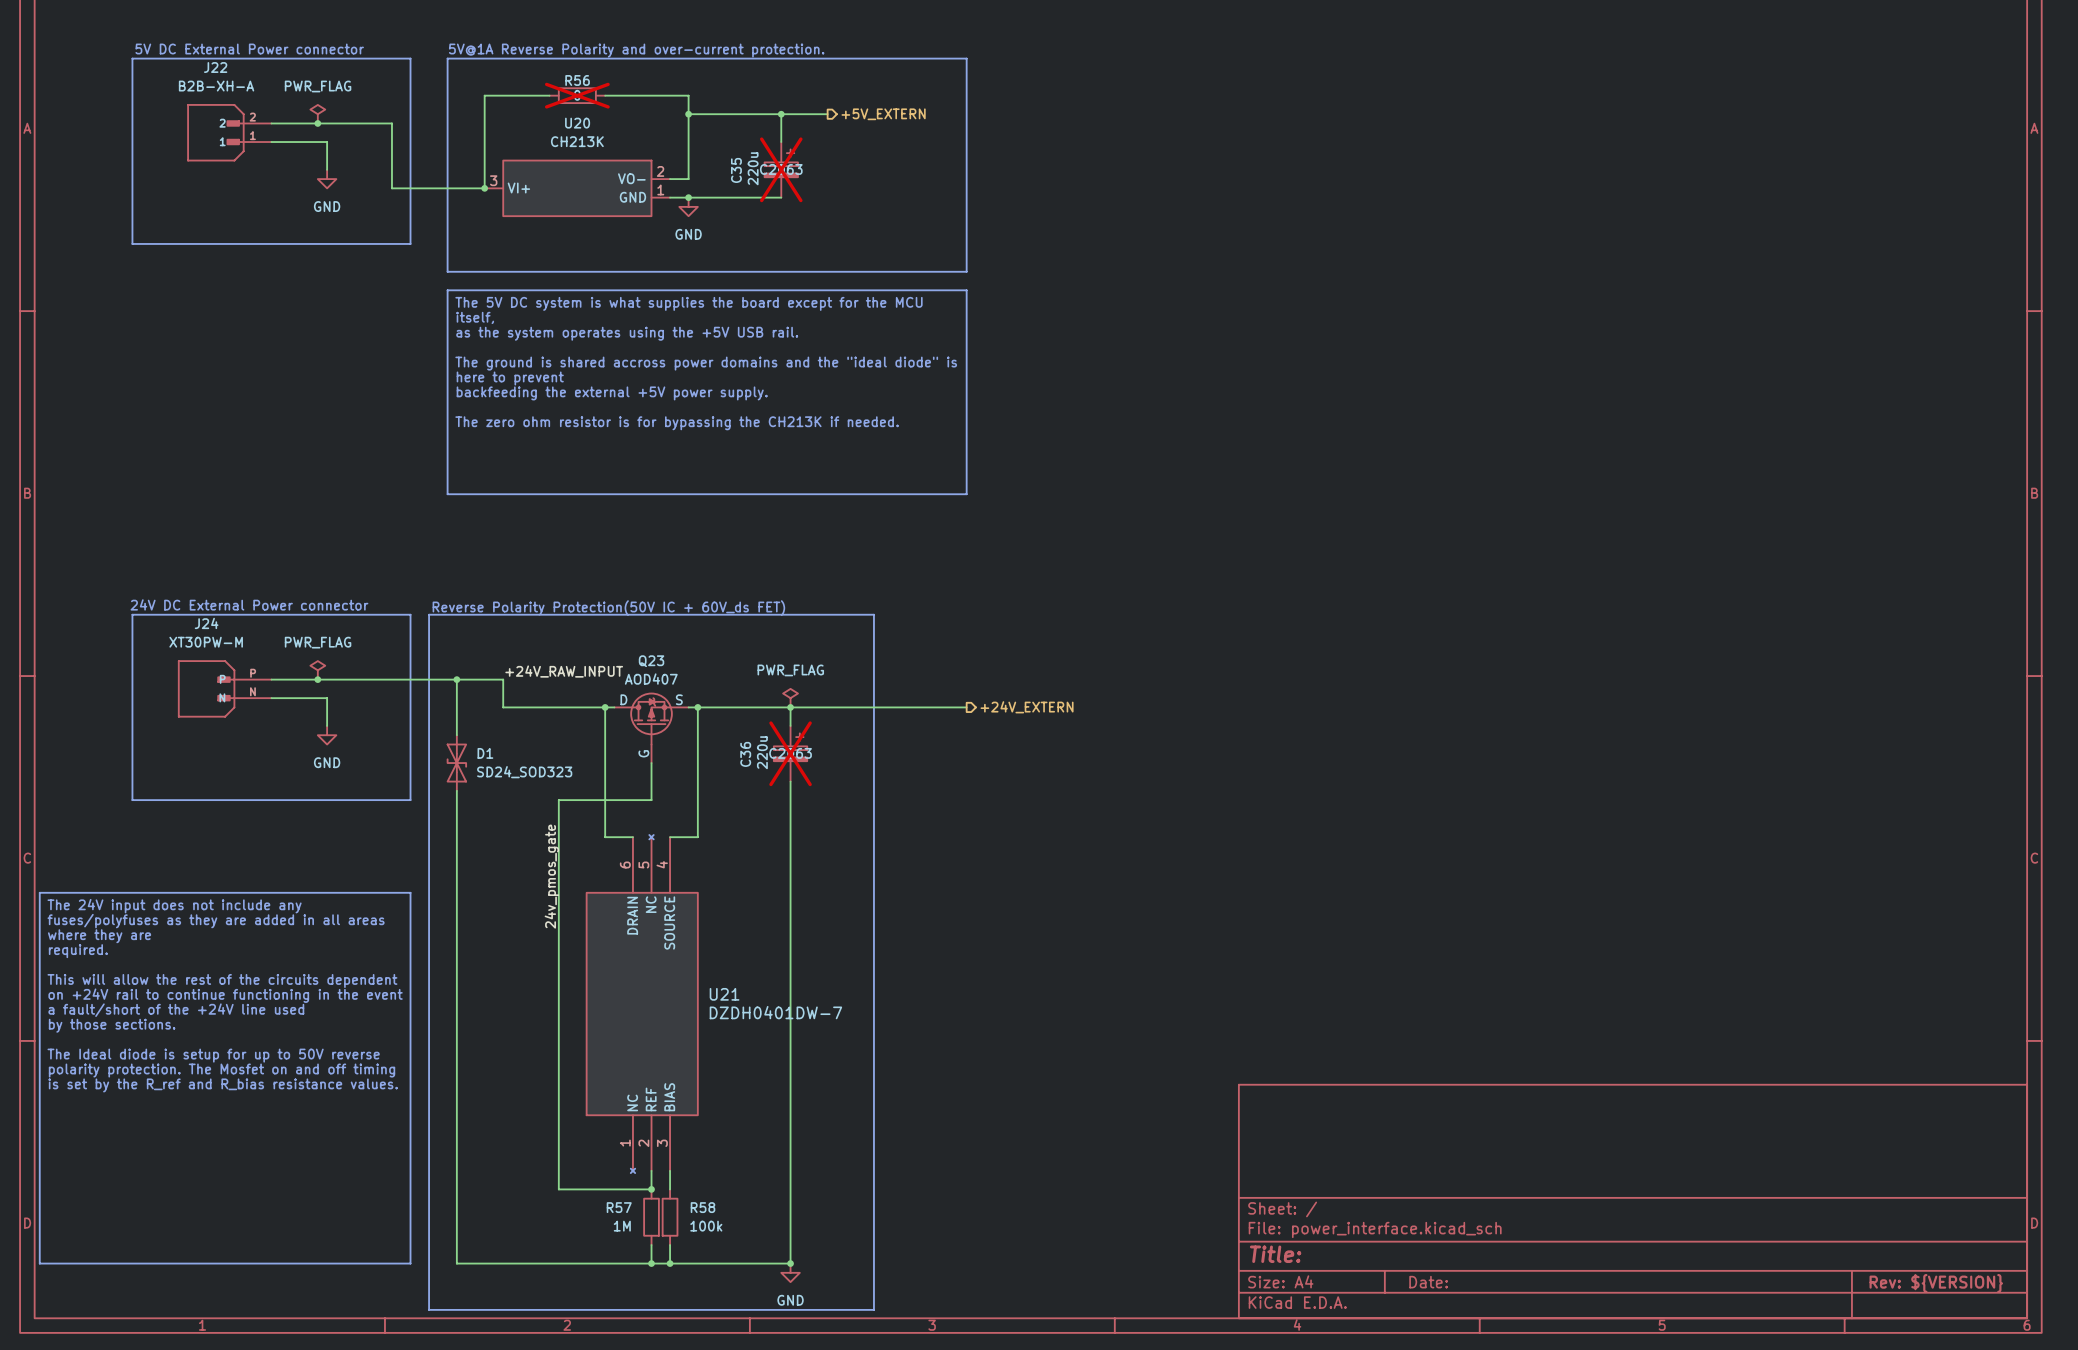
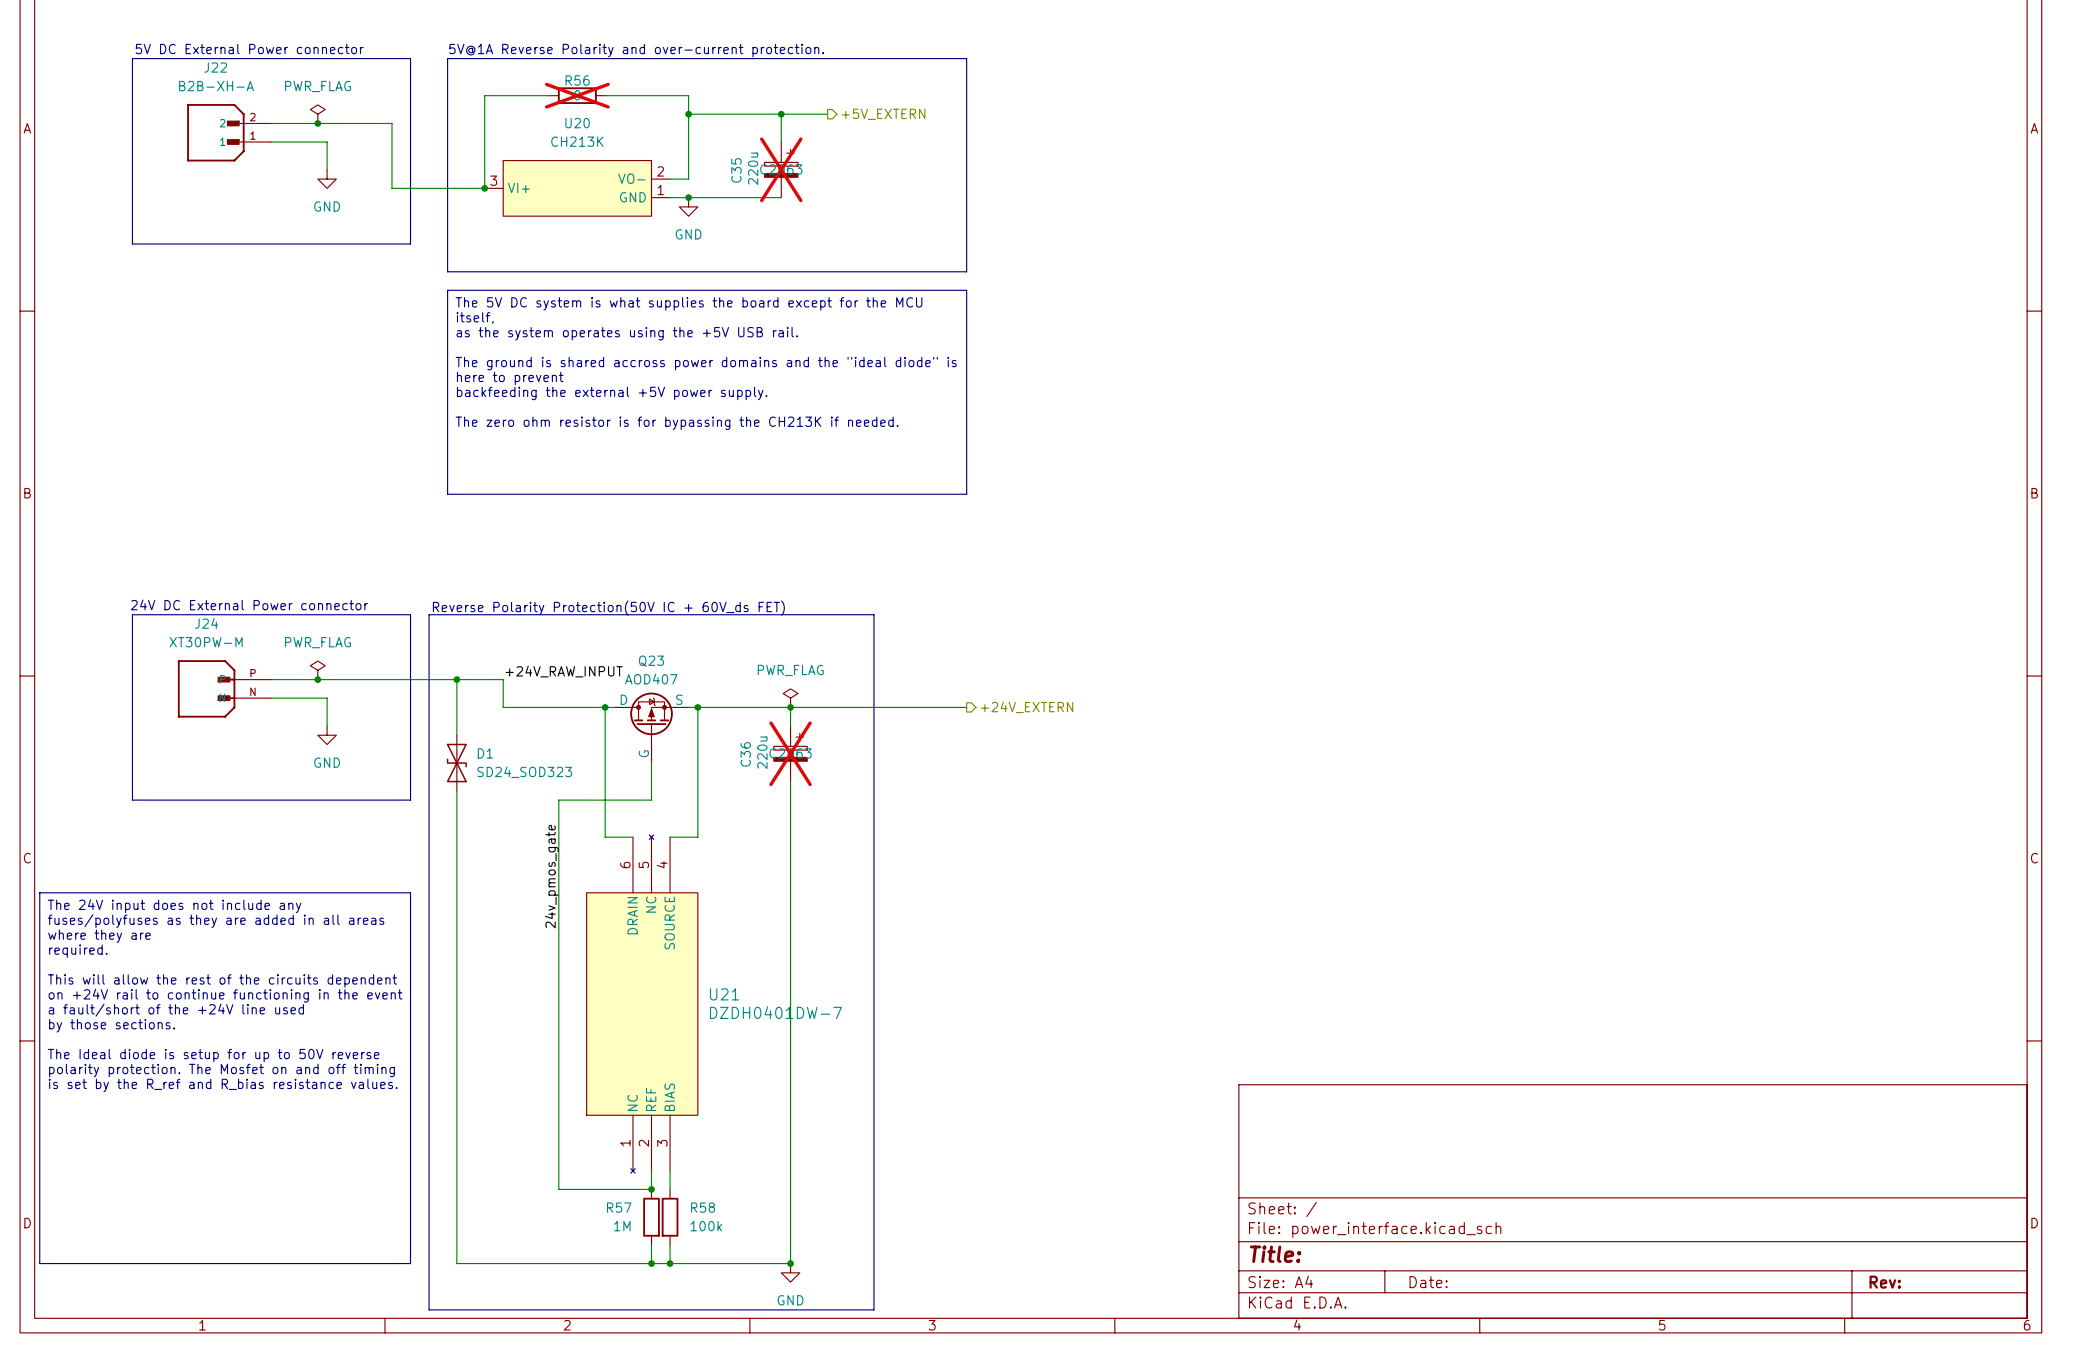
title block: Rev: ${VERSION} (1936, 1283) -> Rev: (1885, 1282)

